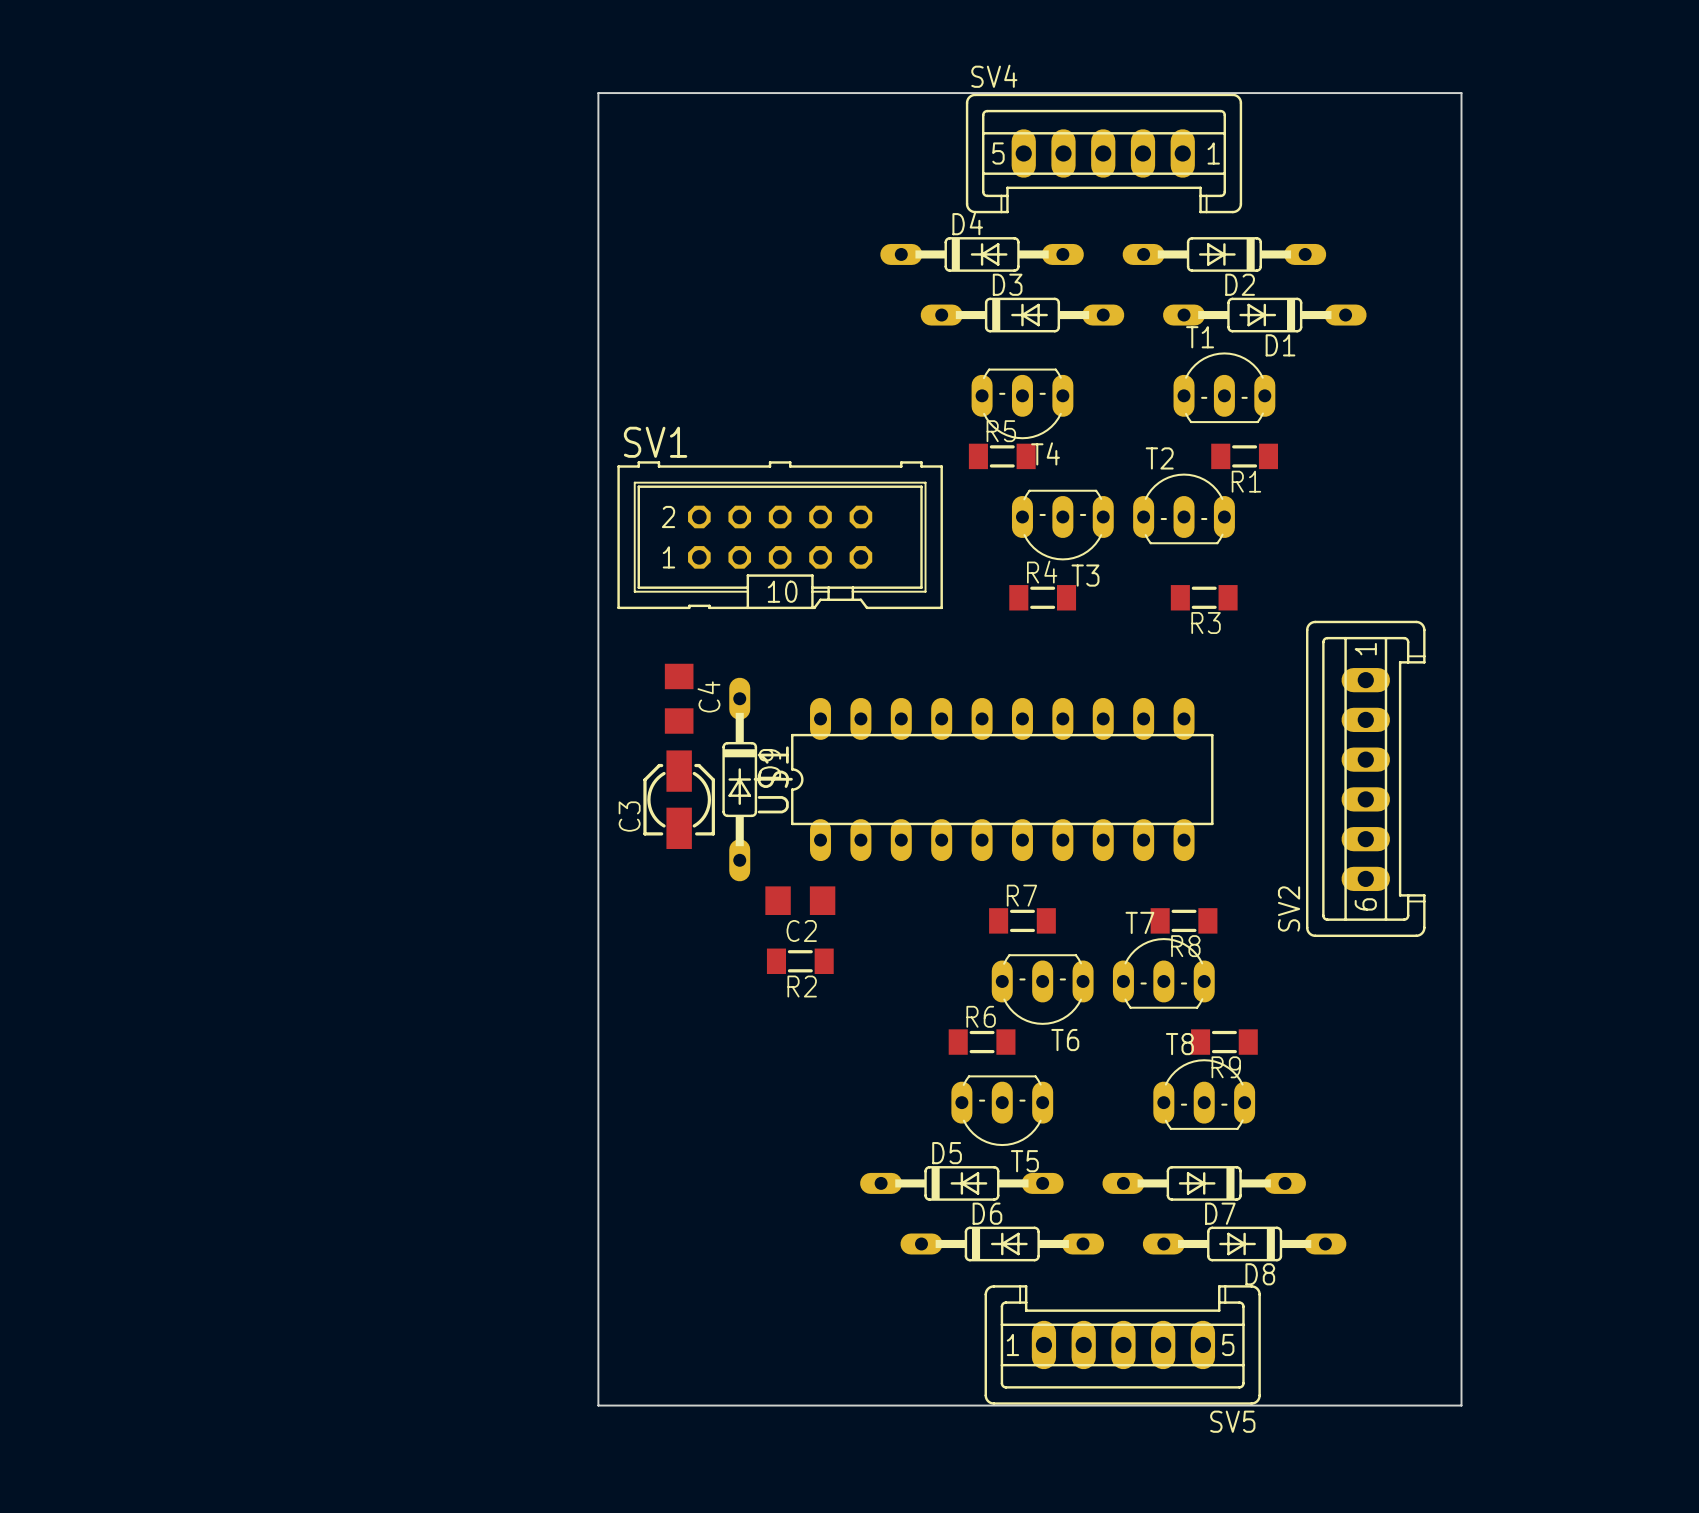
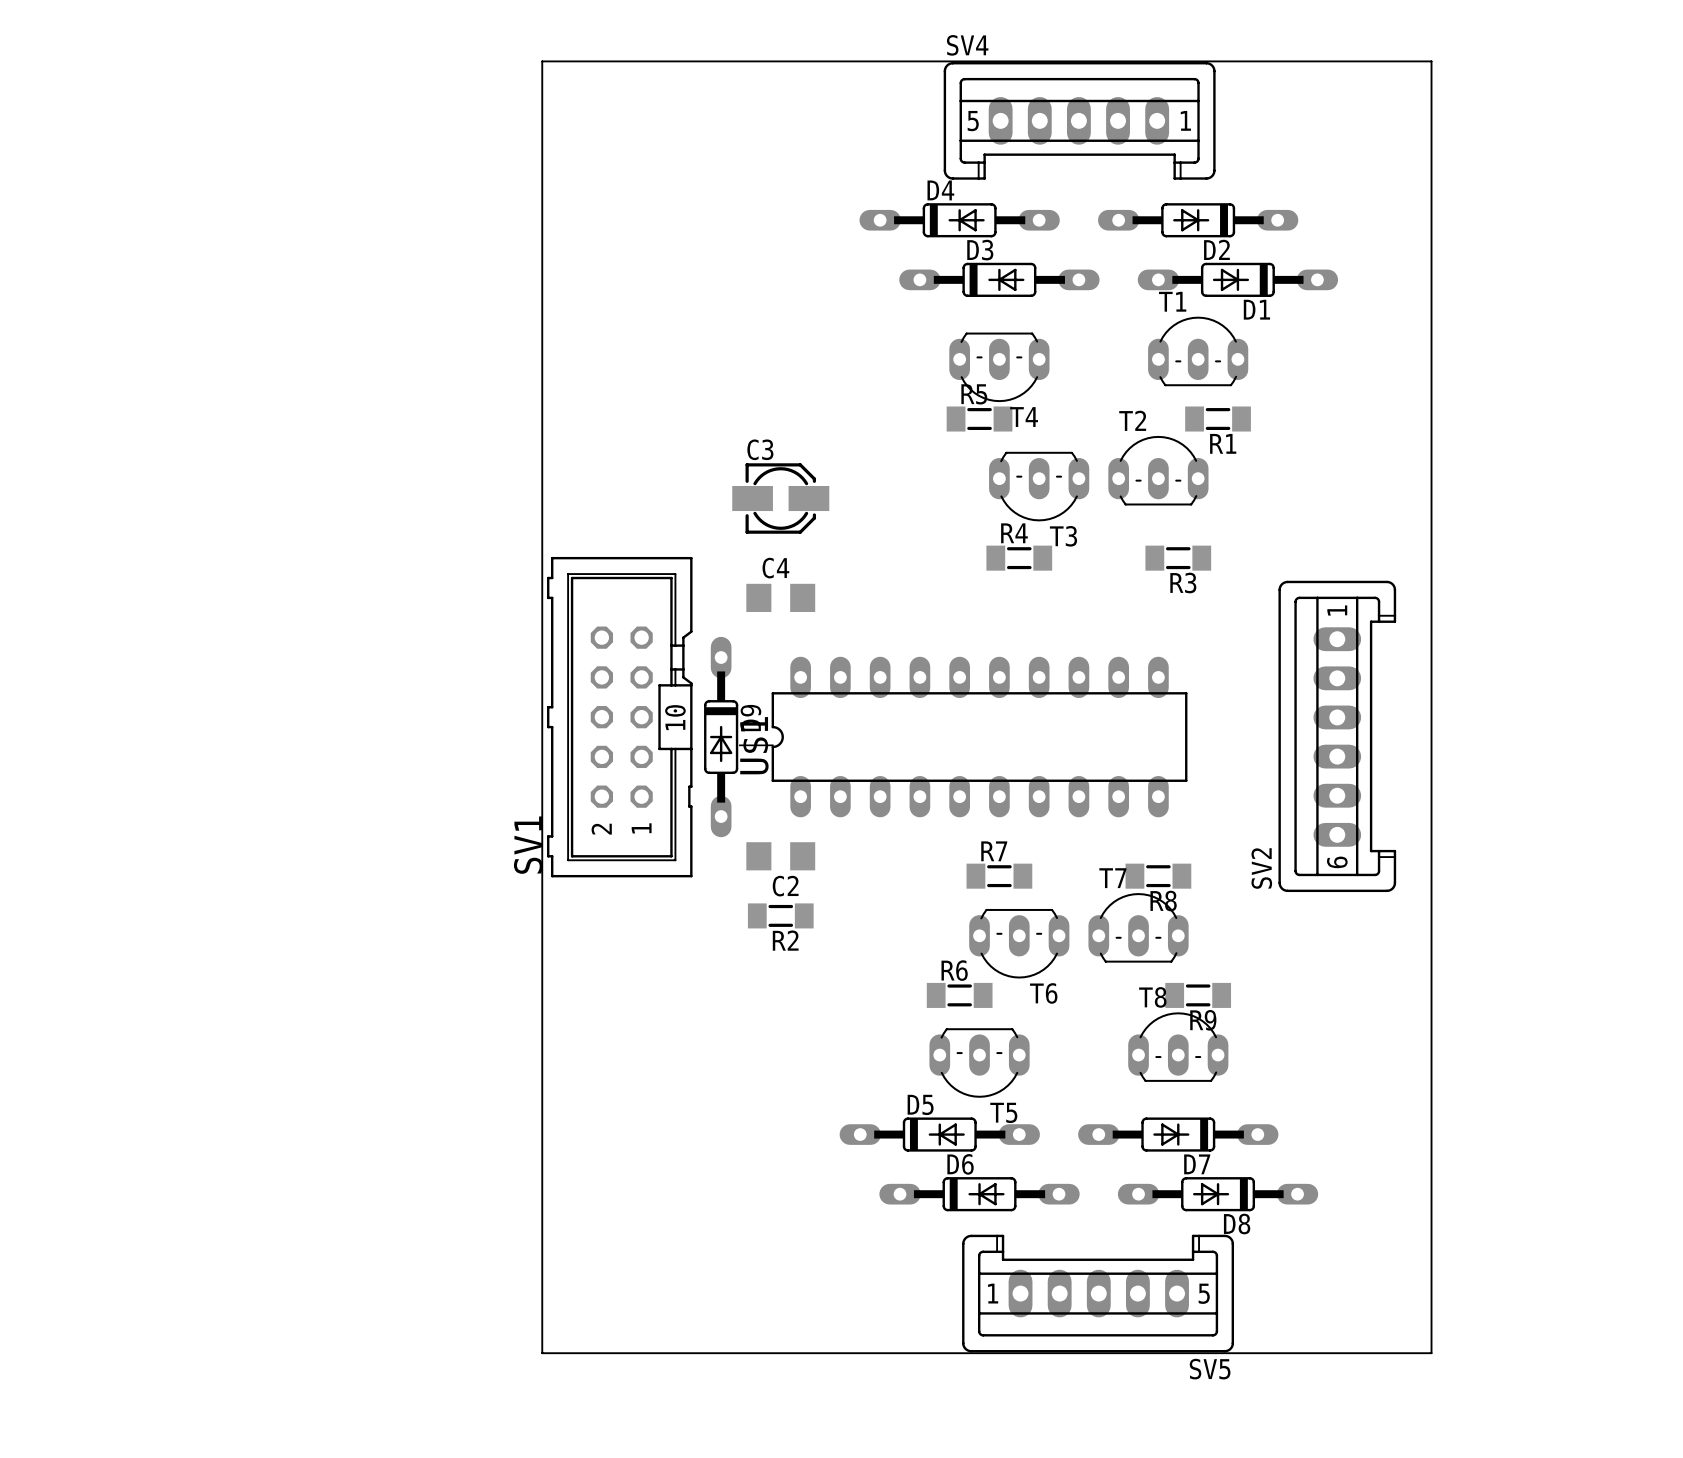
board edge: (598, 93) (598, 1405) -> (582, 61) (542, 61) (542, 1353) (582, 1353)
SV1 rotation: 0° (780, 535) -> 90° counterclockwise (619, 717)
SV1 position: (780, 535) -> (619, 717)
C4 name position: C4 (708, 696) -> C4 (775, 568)
C4 rotation: 0° (679, 698) -> 90° clockwise (780, 597)
C4 position: (679, 698) -> (780, 597)
C3 rotation: 0° (679, 799) -> 90° clockwise (780, 498)
C3 position: (679, 799) -> (780, 498)

